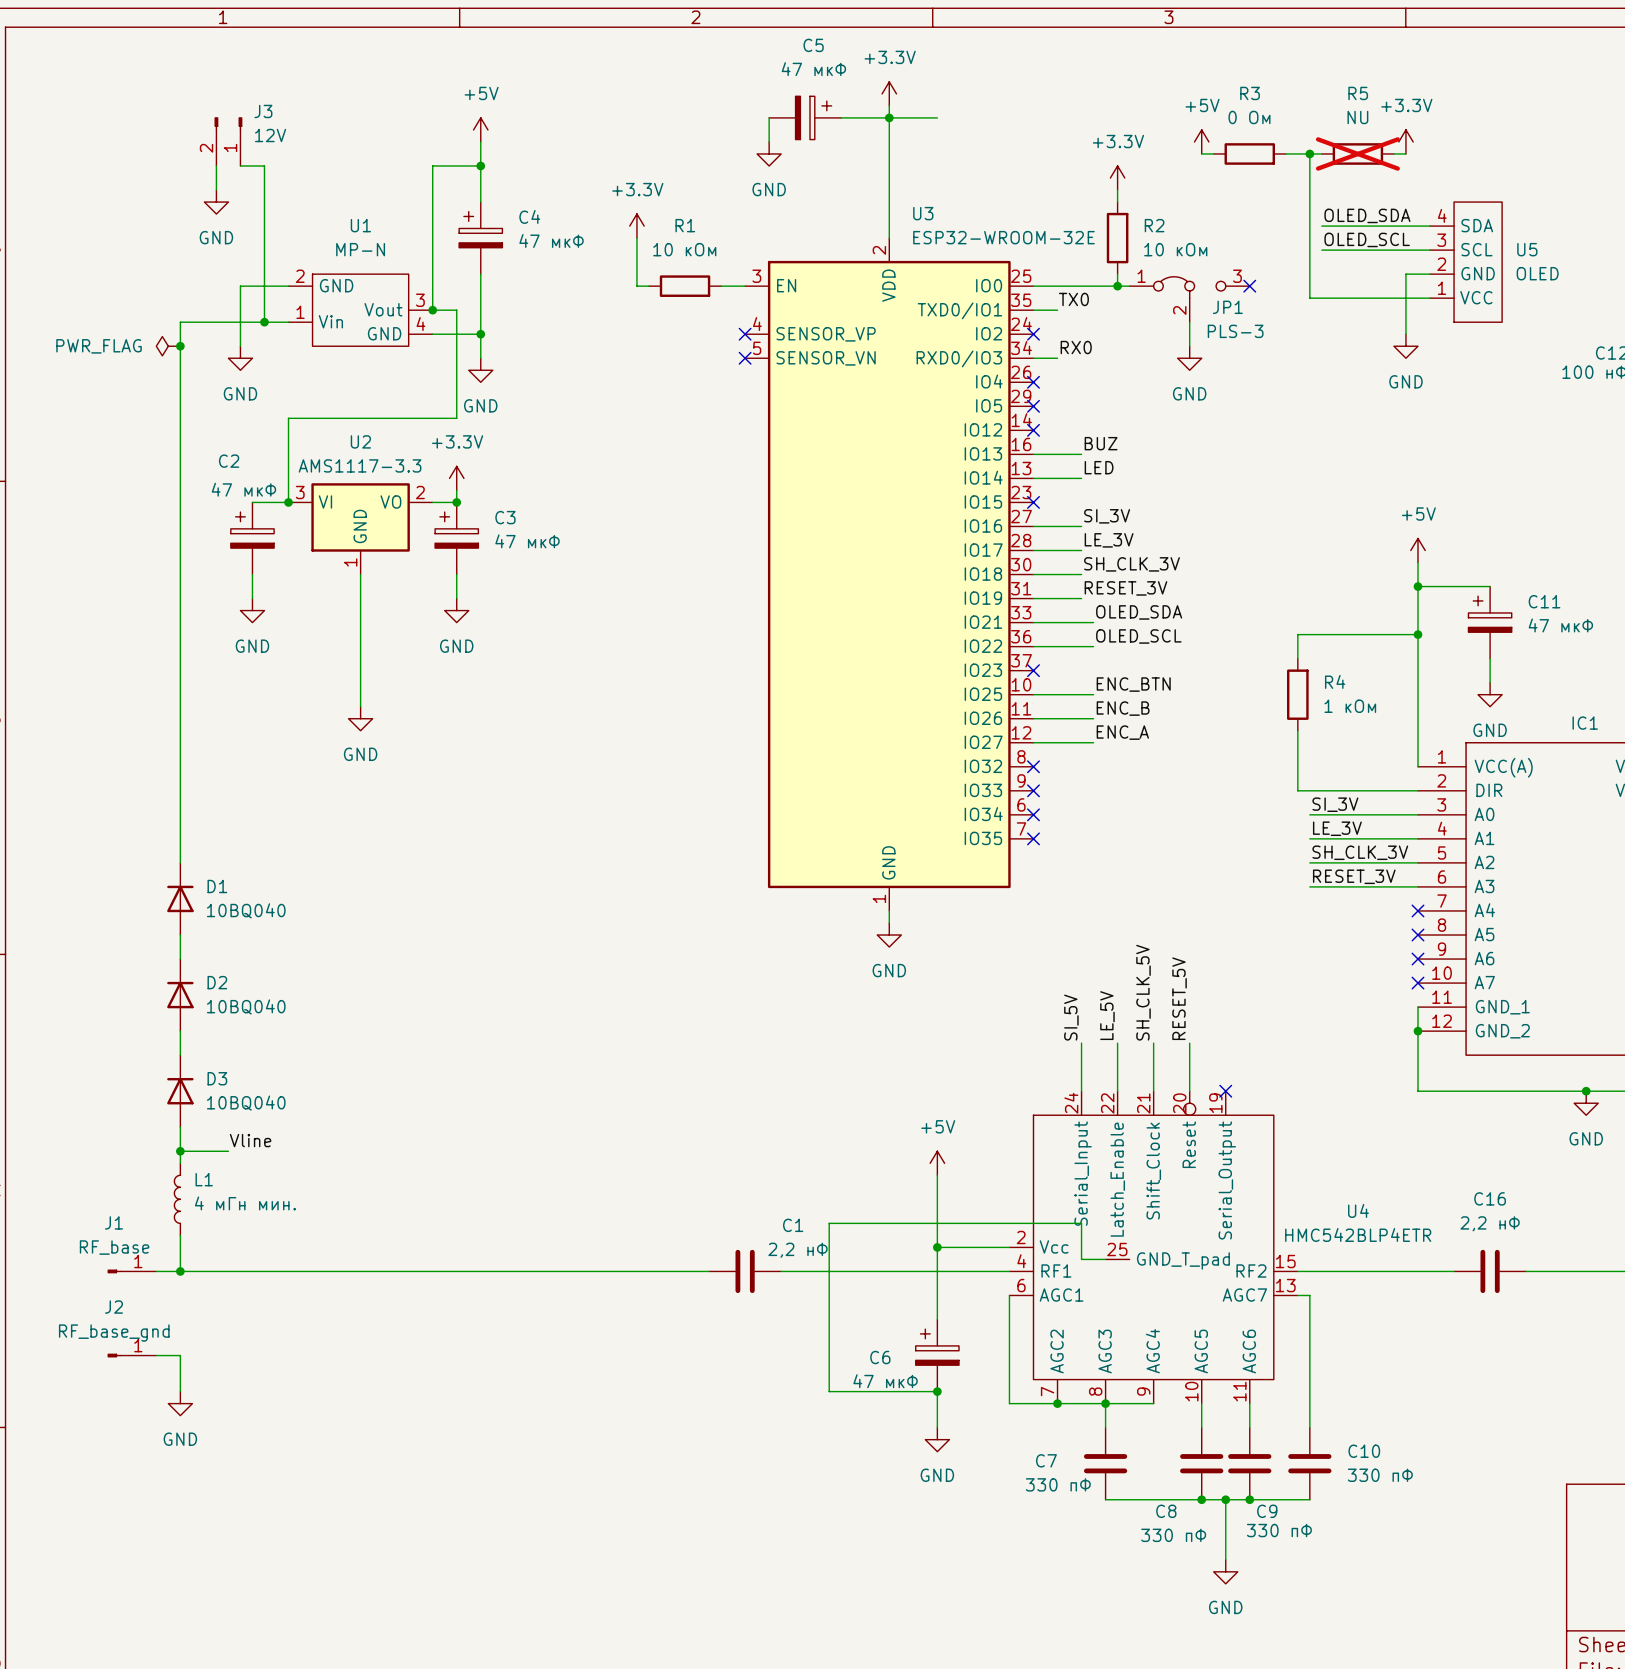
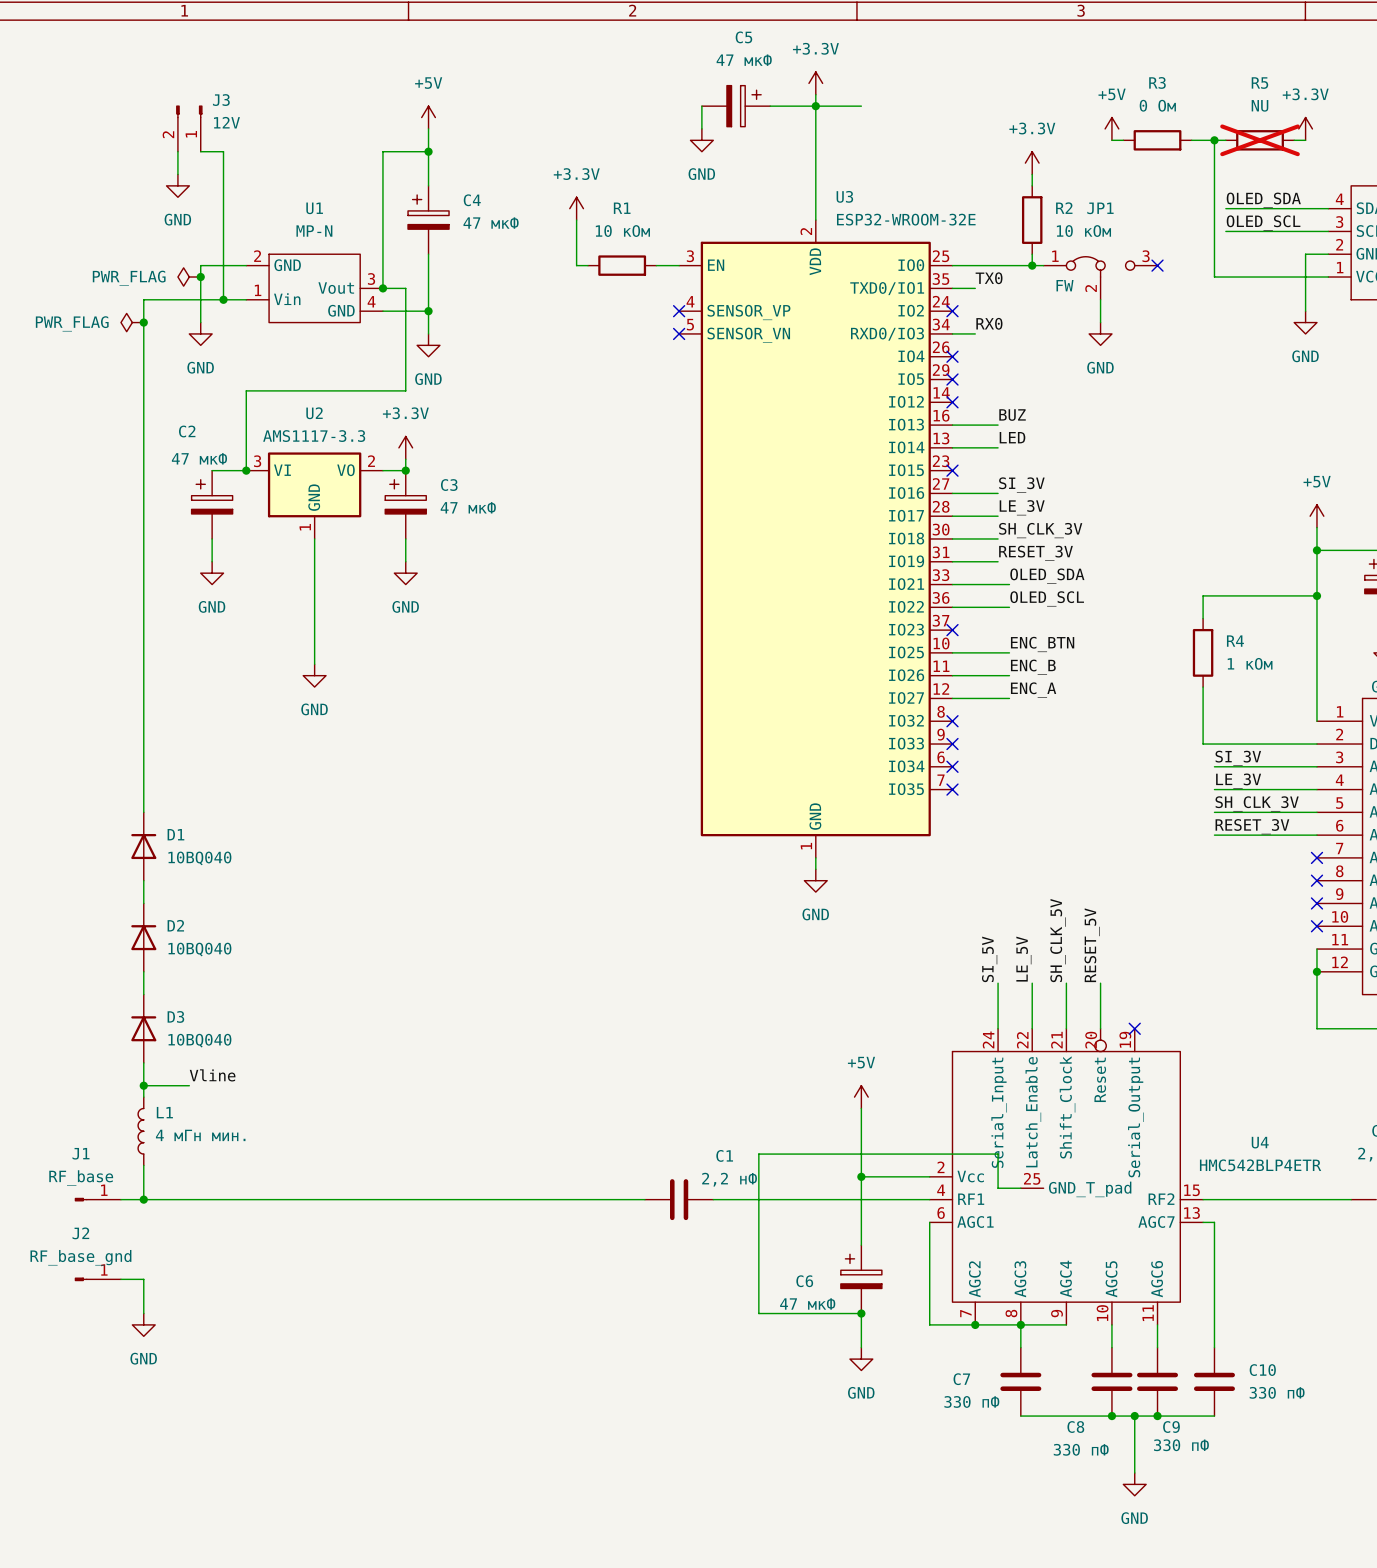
power symbol: none -> PWR_FLAG (189, 277)
junction: none -> (200, 277)
JP1 name position: JP1 (1227, 307) -> JP1 (1100, 208)
JP1 value: PLS-3 (1235, 331) -> FW (1065, 285)

